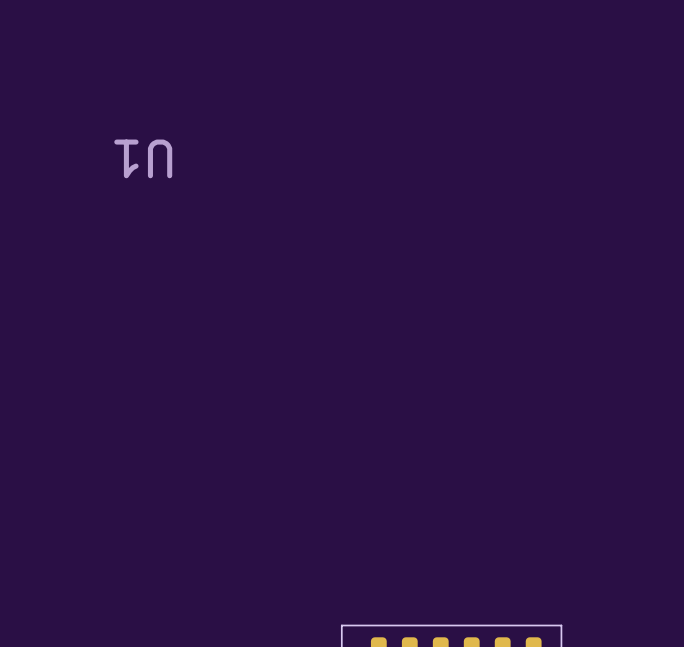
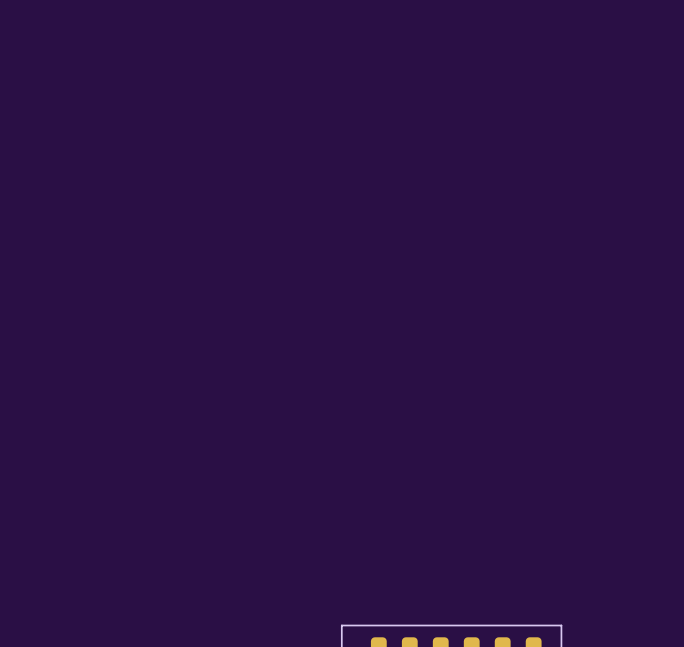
U1 name: U1 (143, 158) -> none

